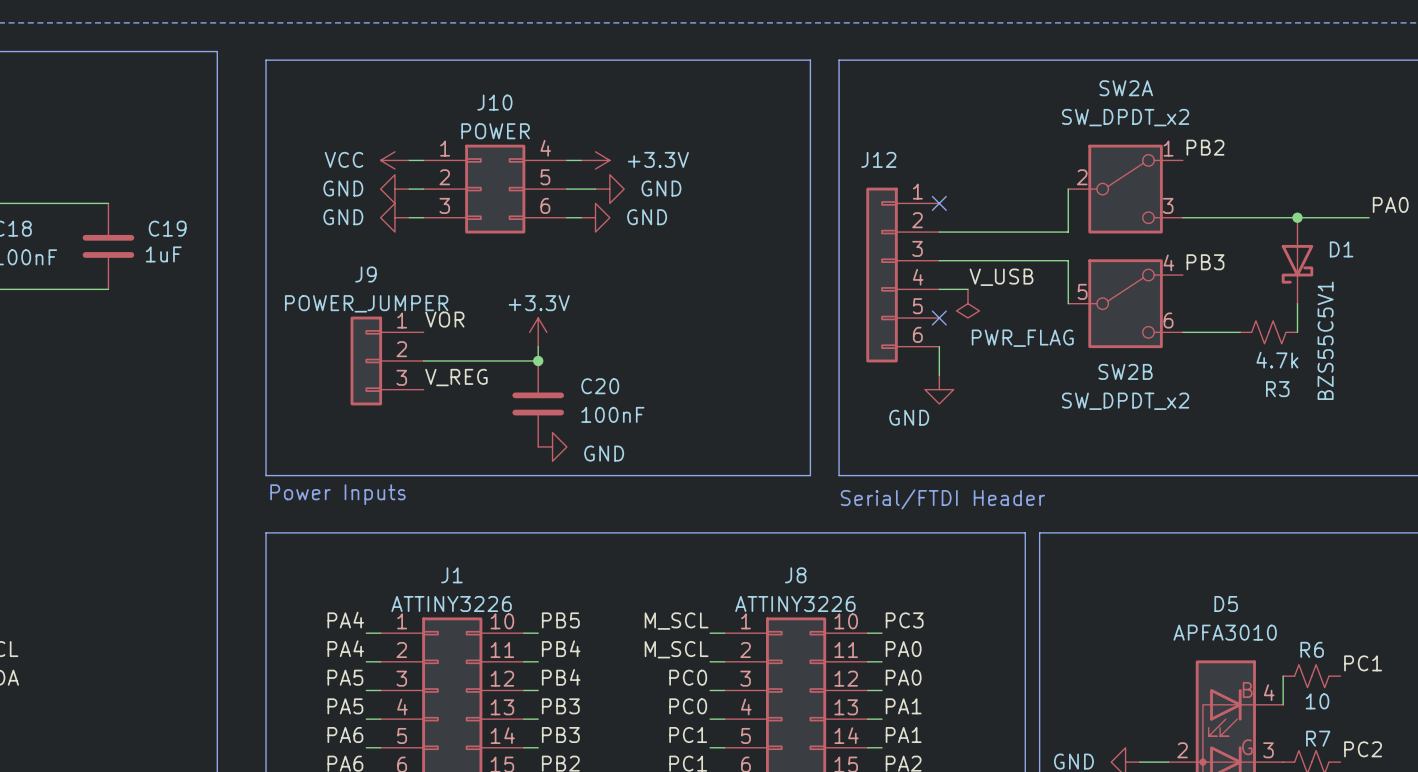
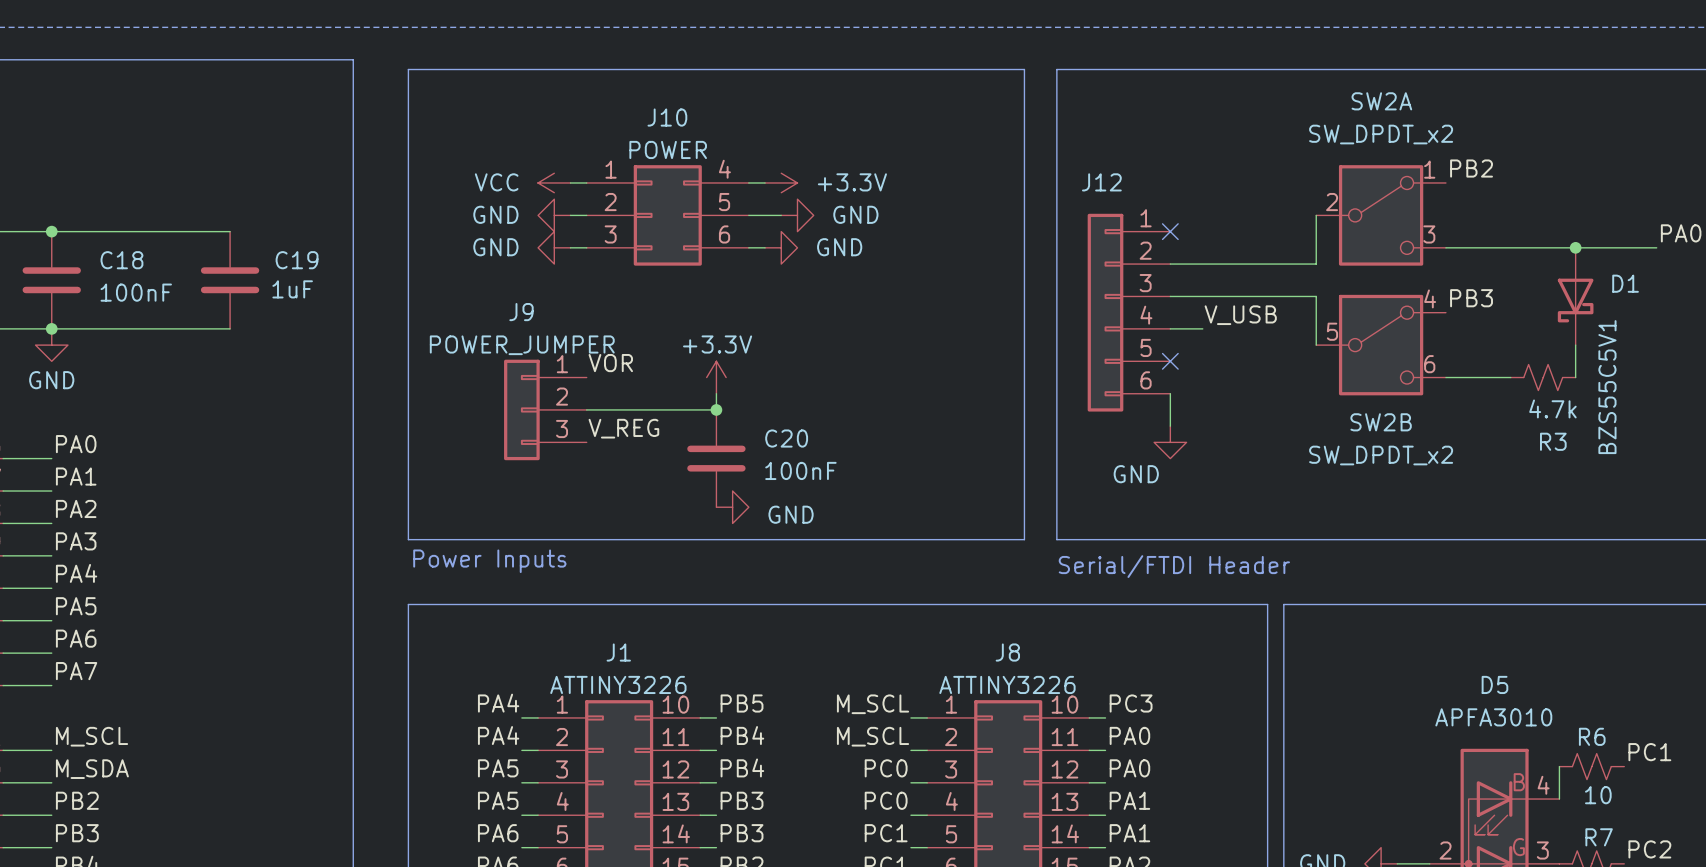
power symbol: PWR_FLAG (967, 303) -> none

